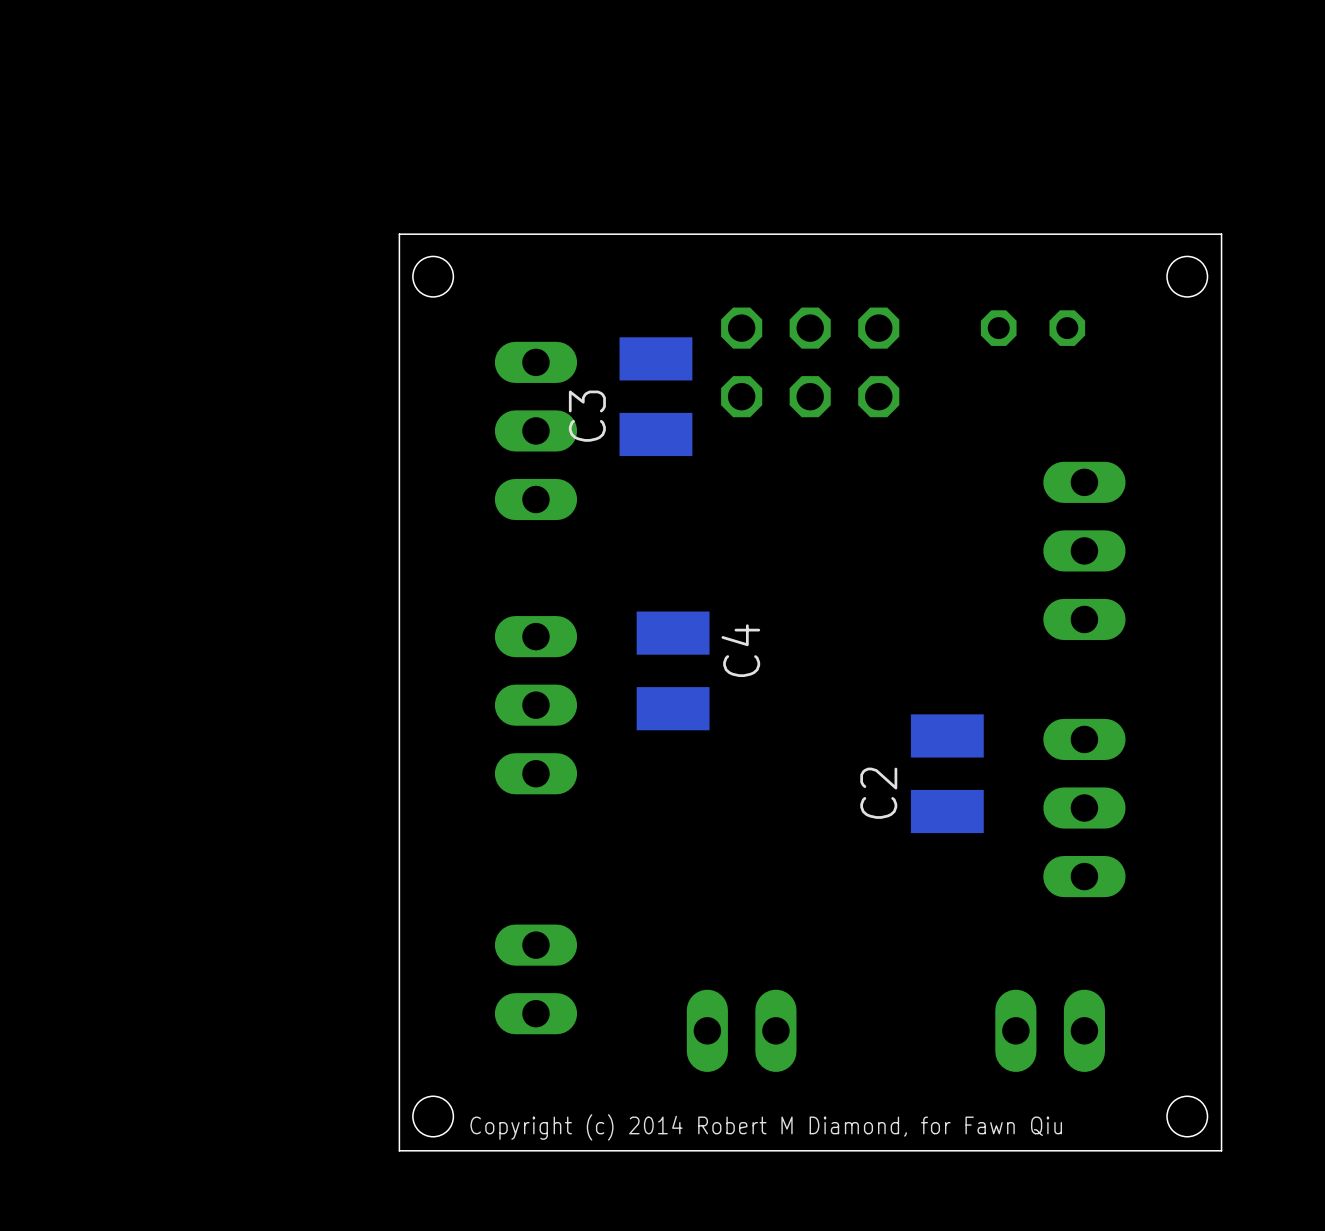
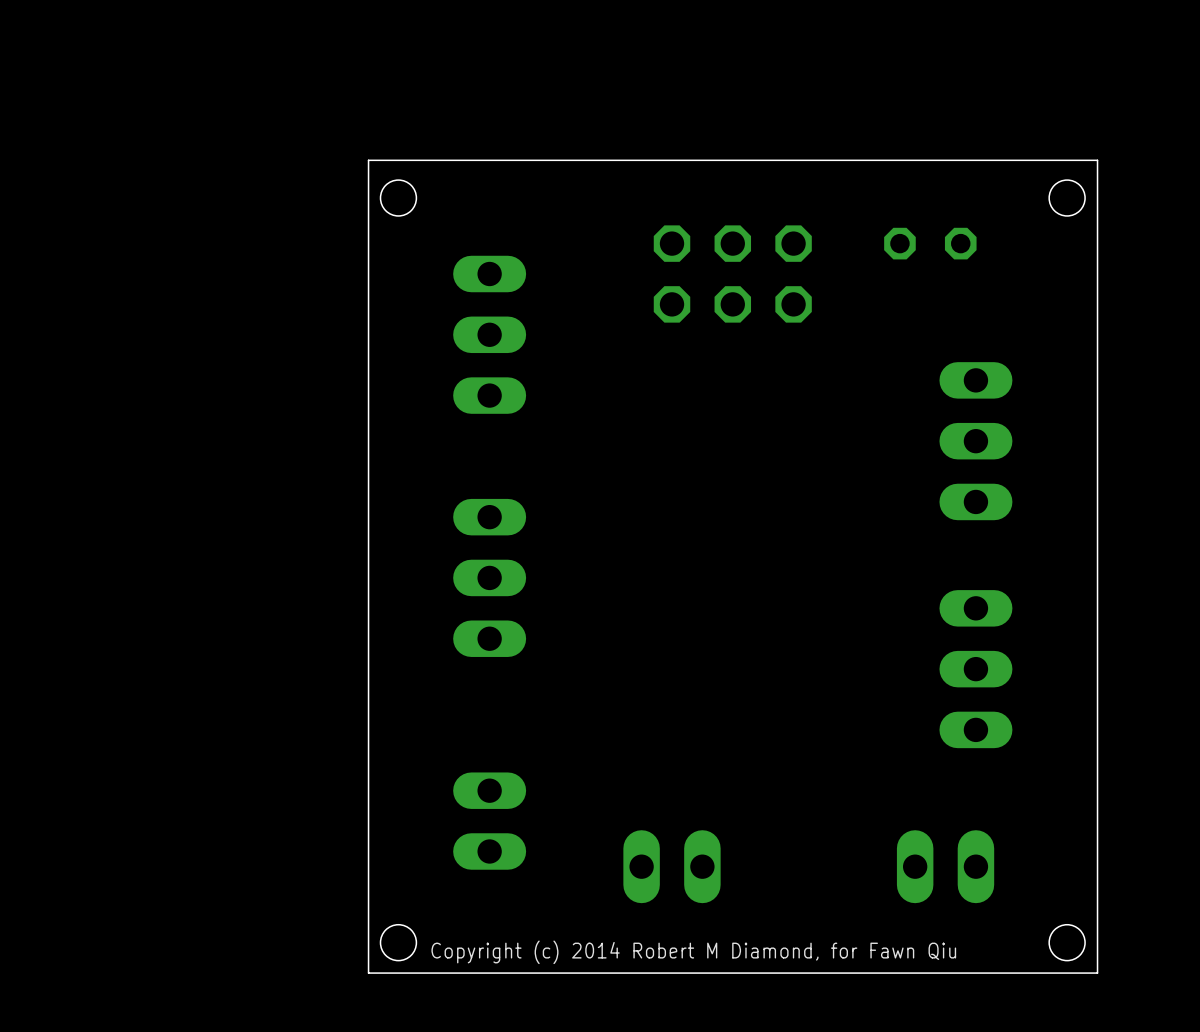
C3: (655, 396) -> none
C4: (673, 670) -> none
C2: (947, 773) -> none

